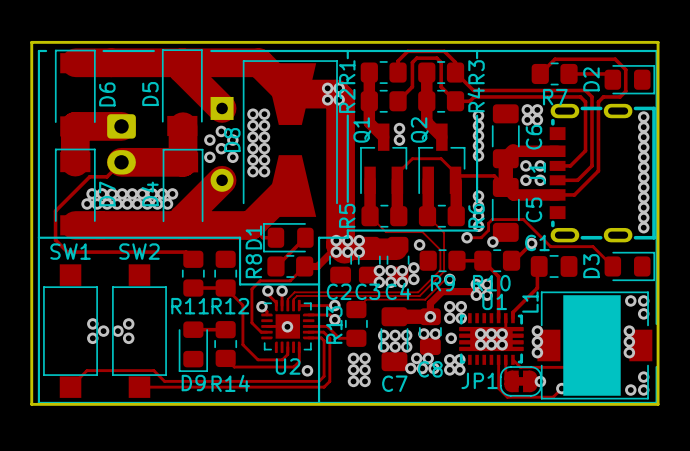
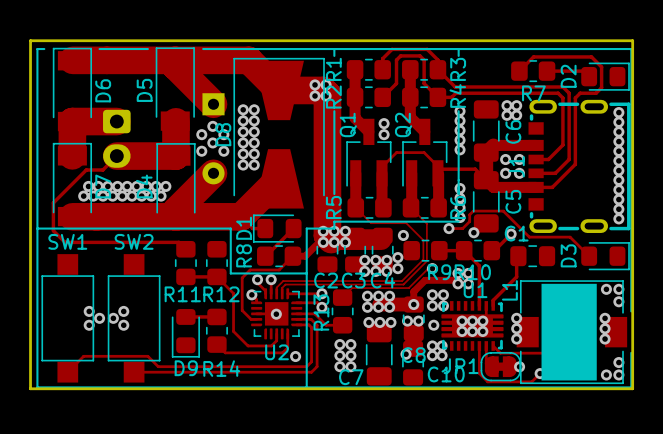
R9 name position: R9 (442, 283) -> R9 (439, 272)
via: none -> (367, 296)
via: none -> (378, 296)
via: none -> (389, 296)
via: none -> (367, 307)
via: none -> (378, 307)
via: none -> (389, 307)
C7 position: (394, 339) -> (379, 354)
via: (383, 346) -> none
via: (395, 346) -> none
via: (406, 346) -> none
via: (416, 358) -> none
via: (428, 358) -> none
via: (410, 368) -> none
via: (433, 368) -> none
C10: none -> (413, 363)
C7 name position: C7 (394, 383) -> C7 (351, 377)

